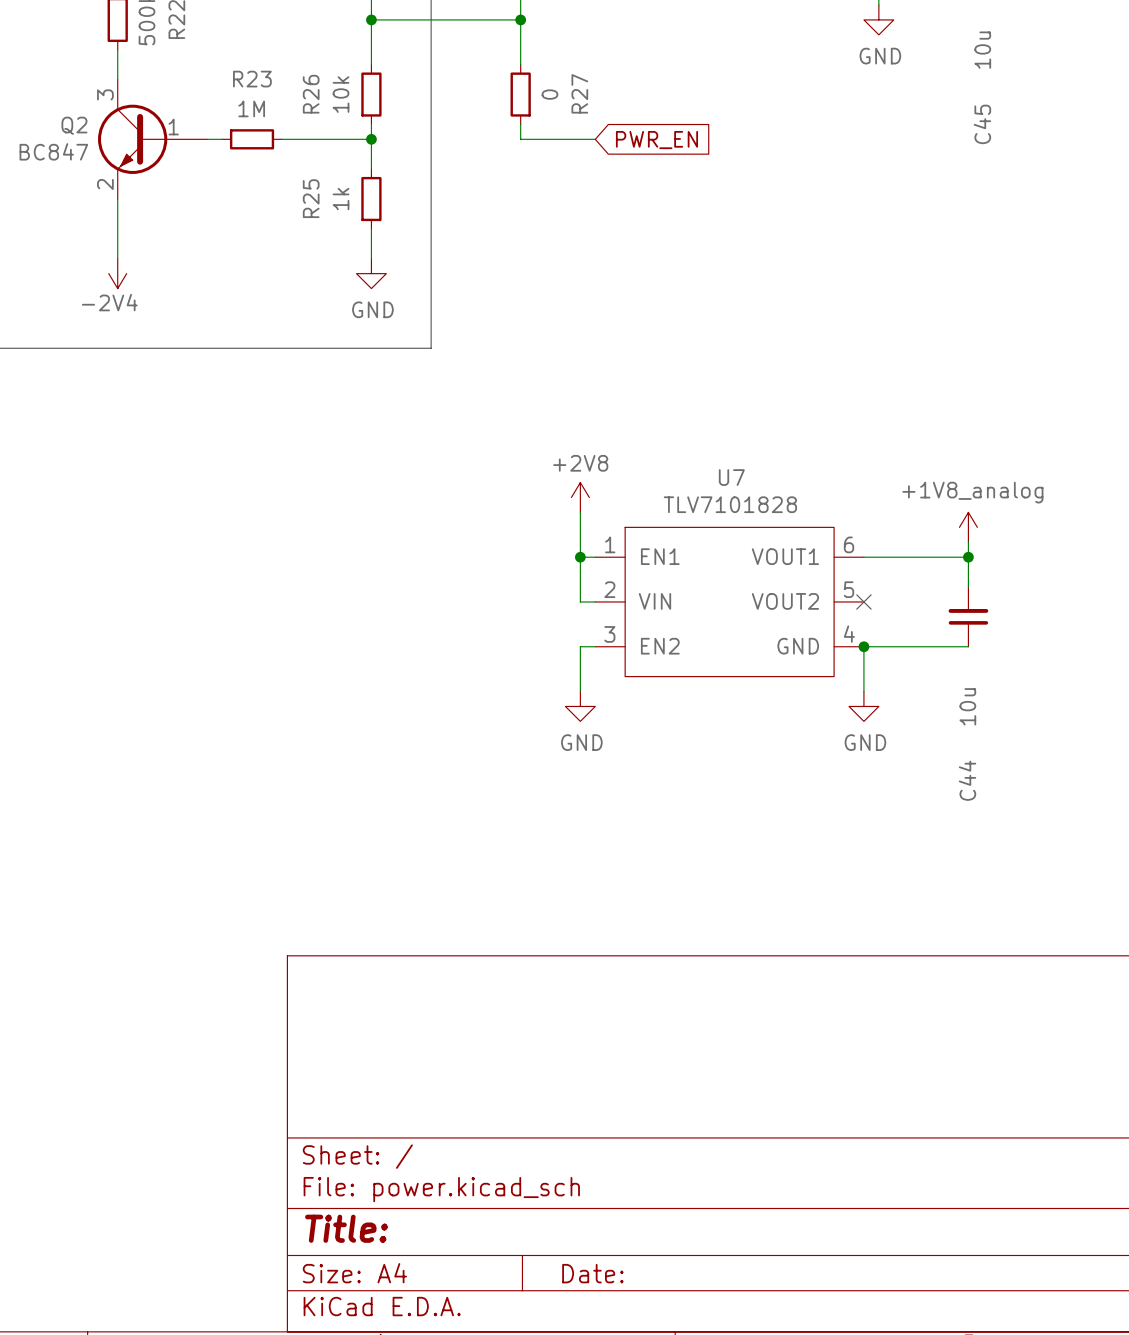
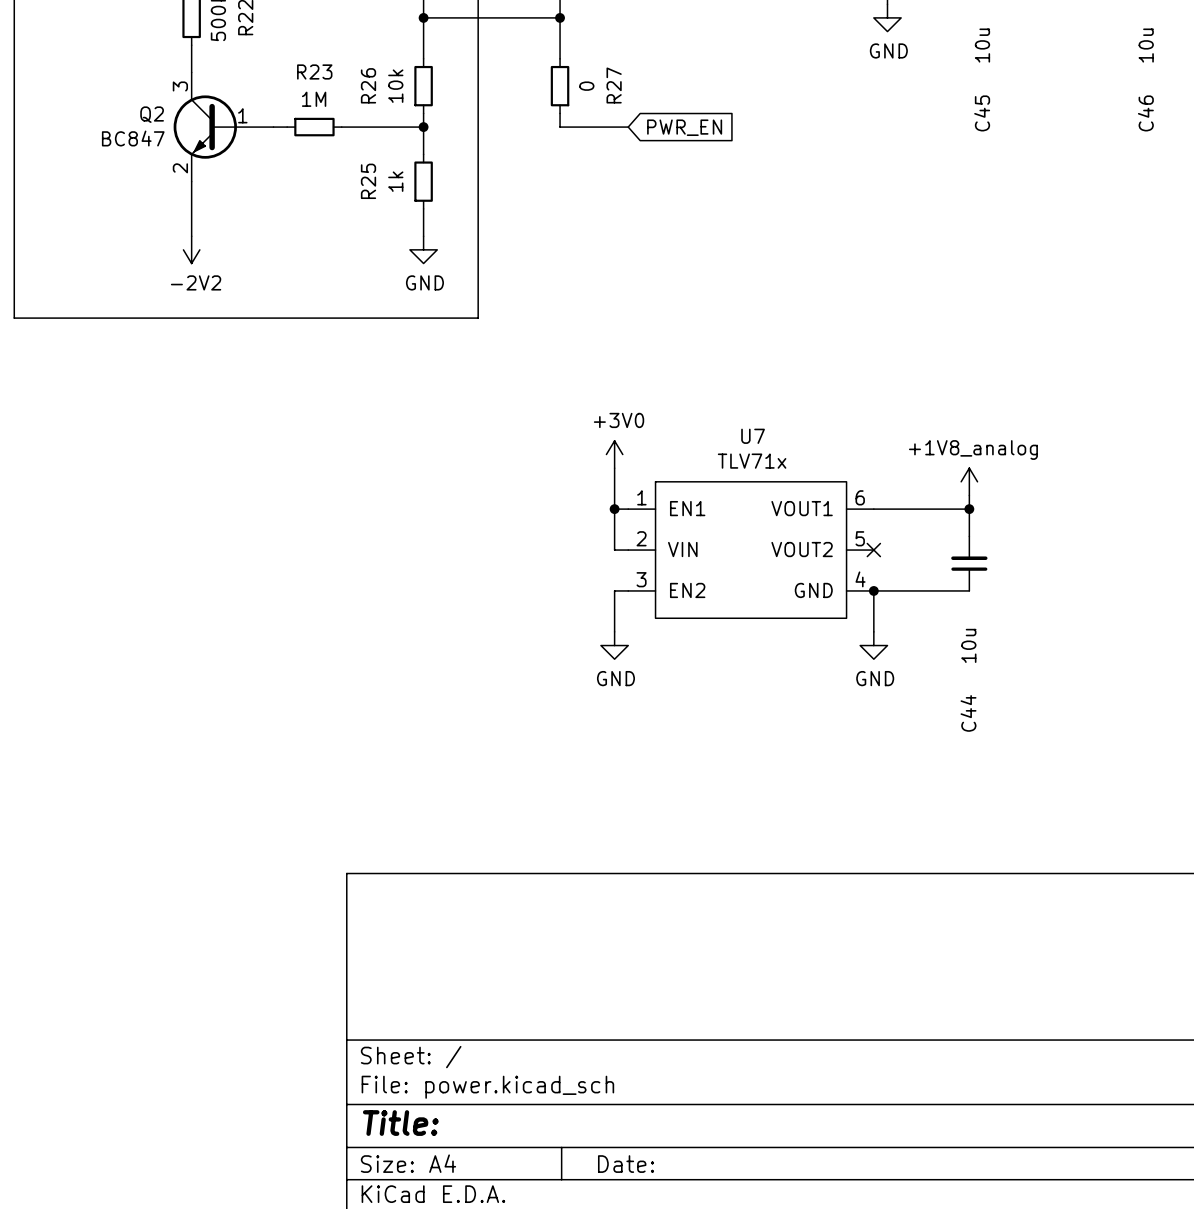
power symbol: -2V4 (117, 273) -> -2V2 (191, 249)
power symbol: +2V8 (580, 497) -> +3V0 (614, 454)
U7 value: TLV7101828 (730, 504) -> TLV71x (752, 461)

